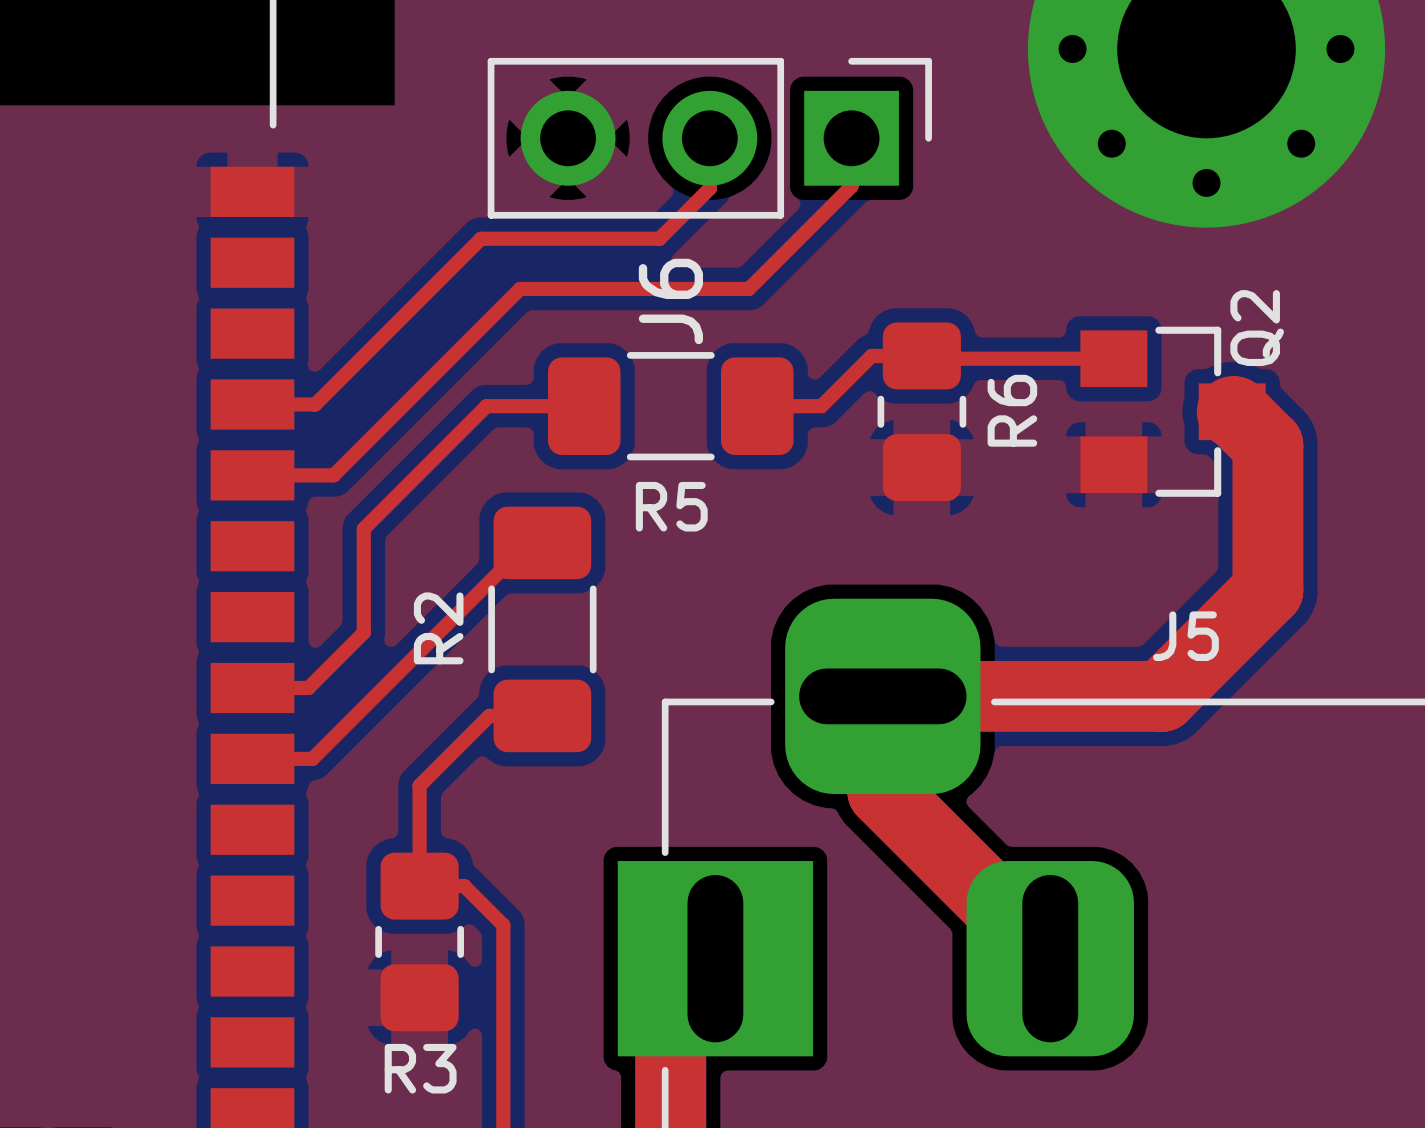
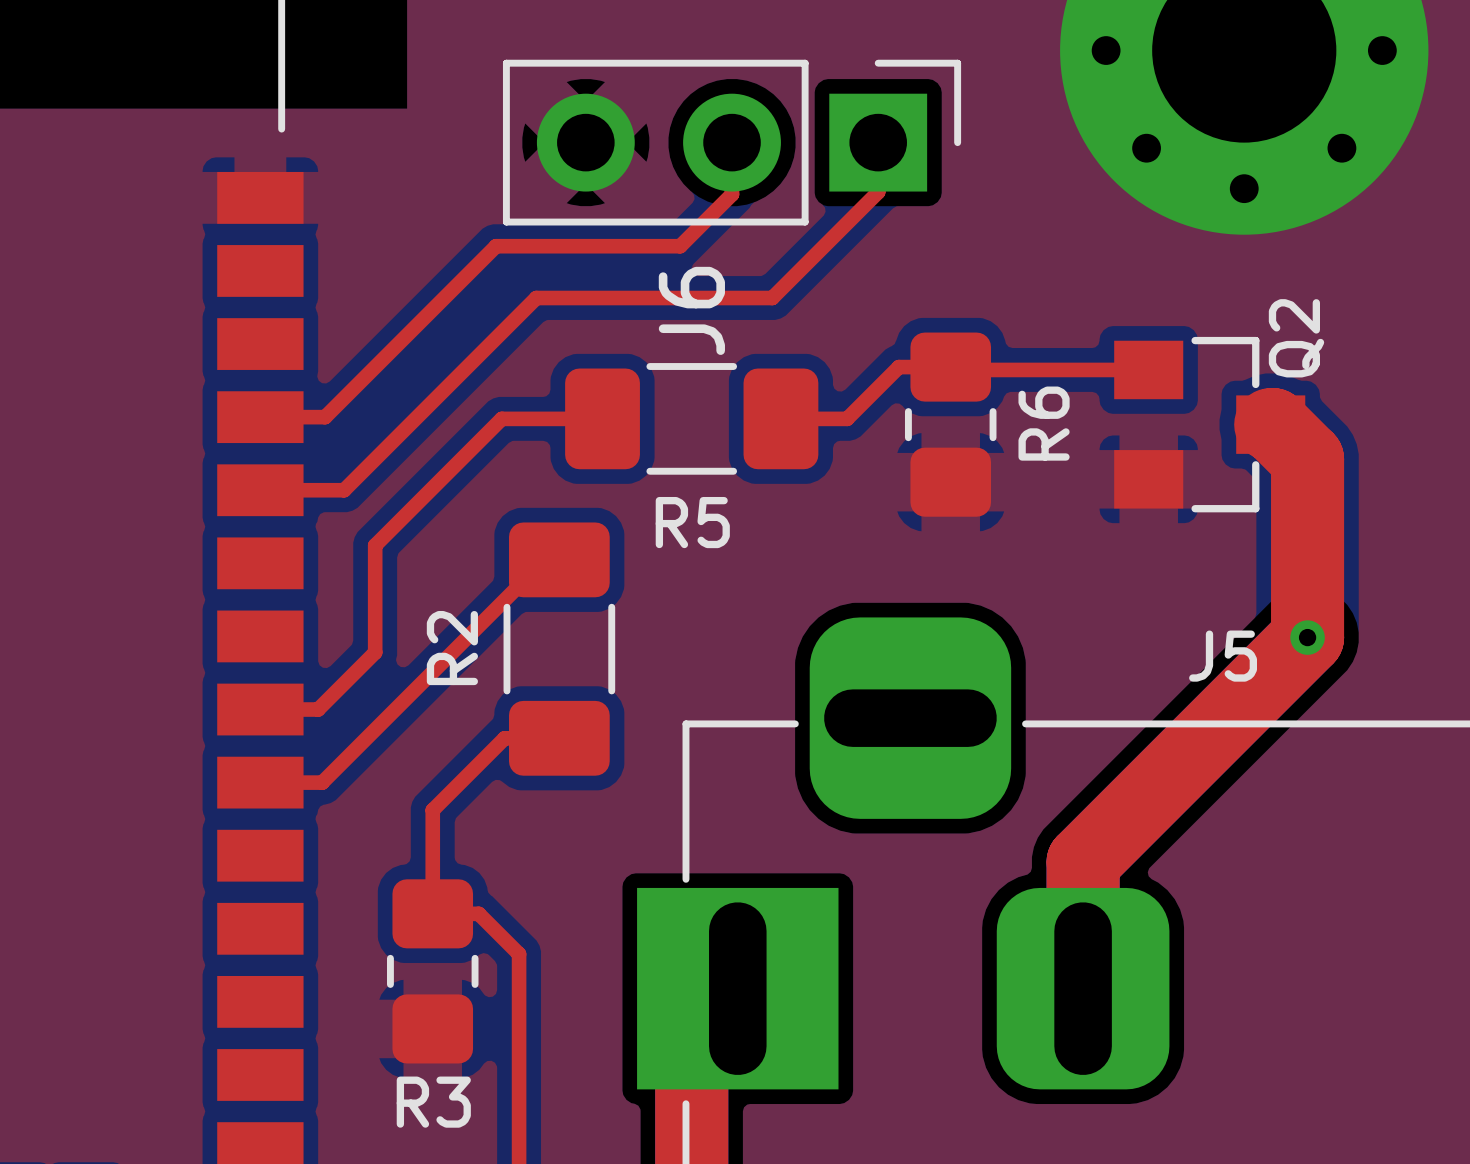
top track: (1267, 590) (1161, 696) (882, 696) (882, 791) (1050, 958) -> (1307, 608) (1307, 637) (1083, 862) (1083, 988)
via: none -> (1307, 637)

